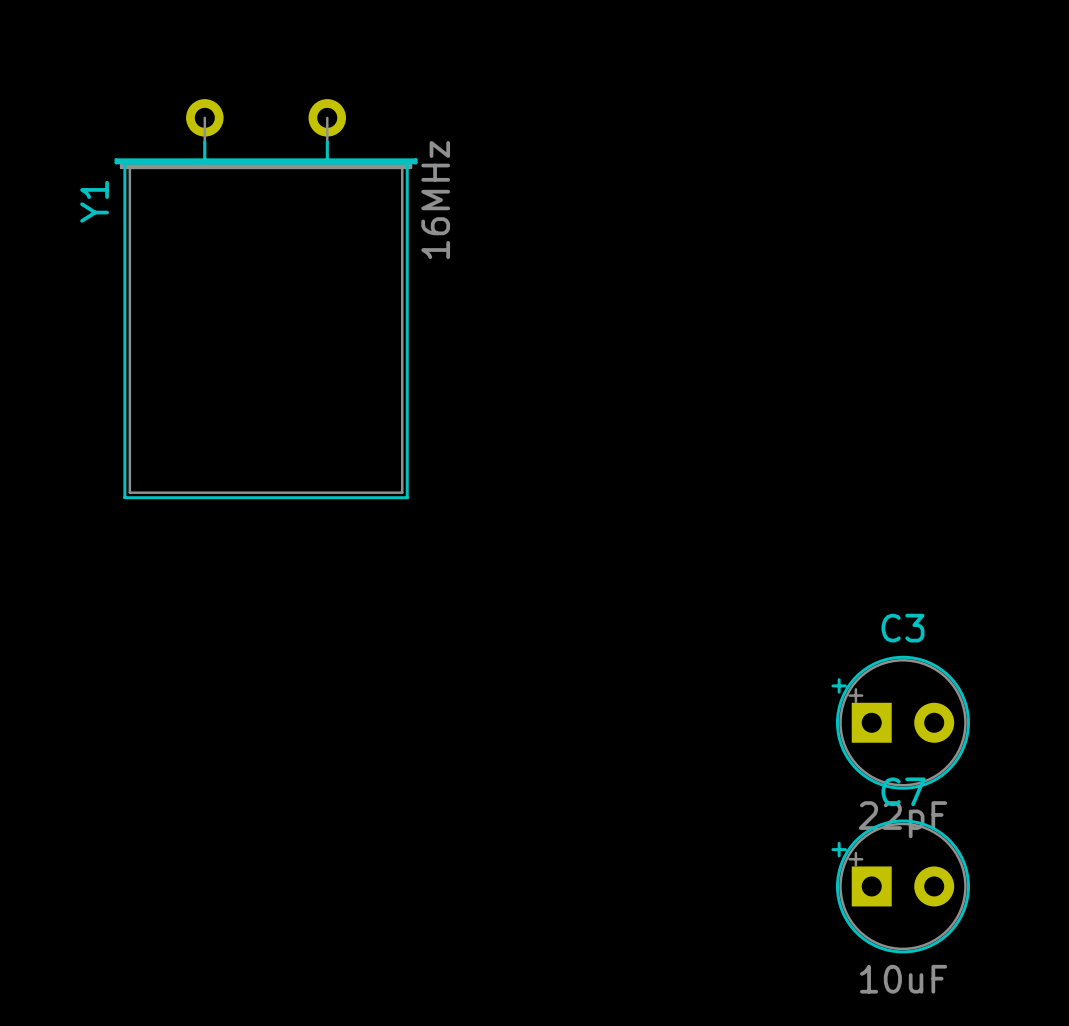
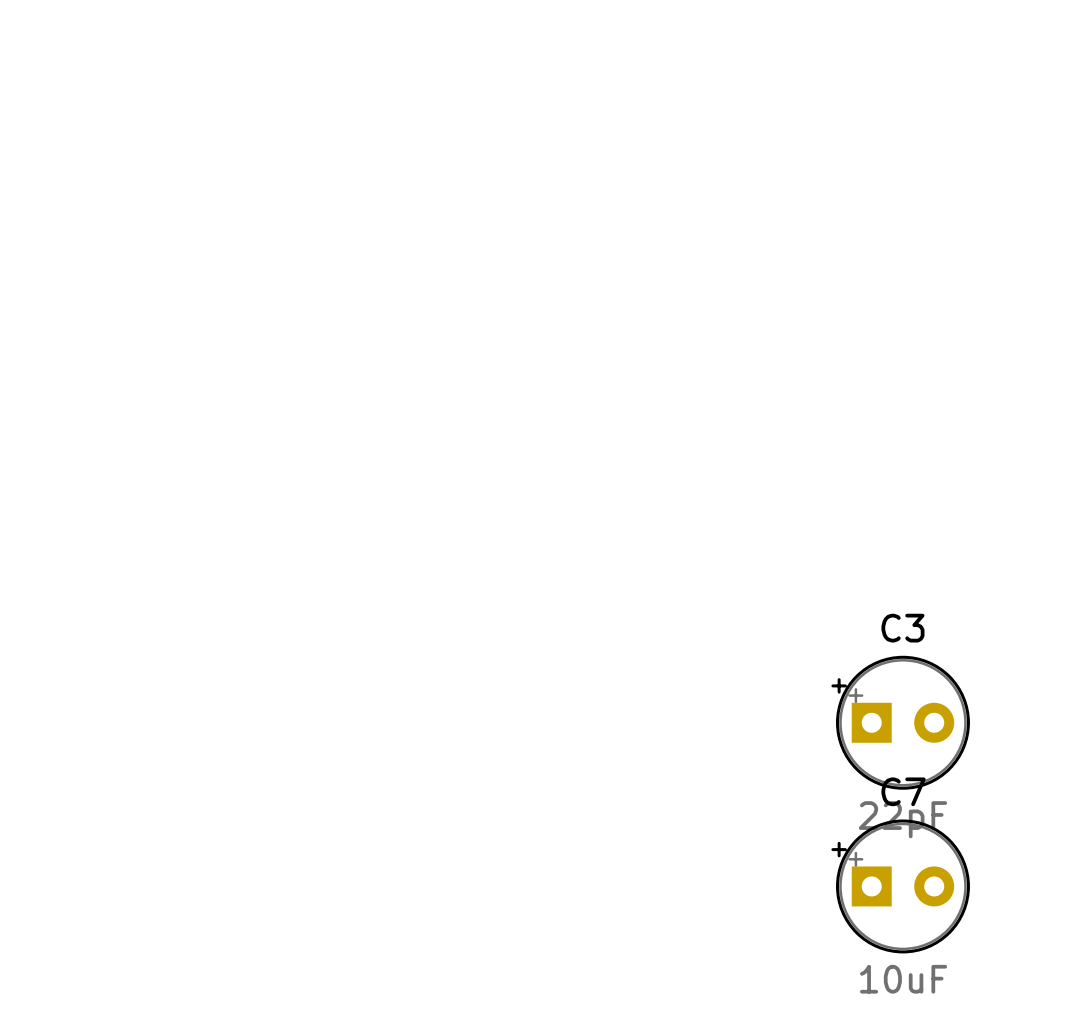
Y1: 16MHz (266, 299) -> none

